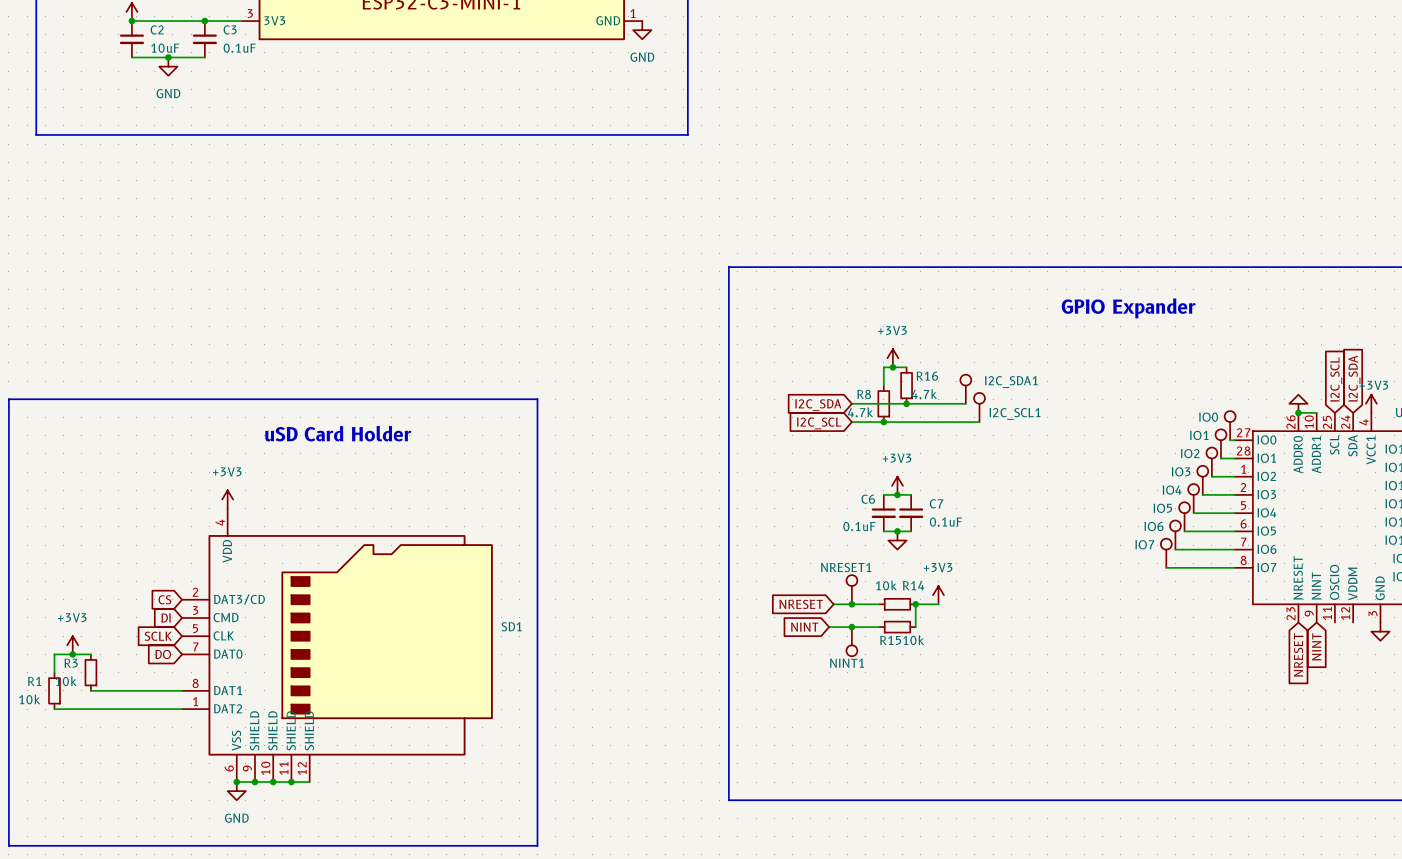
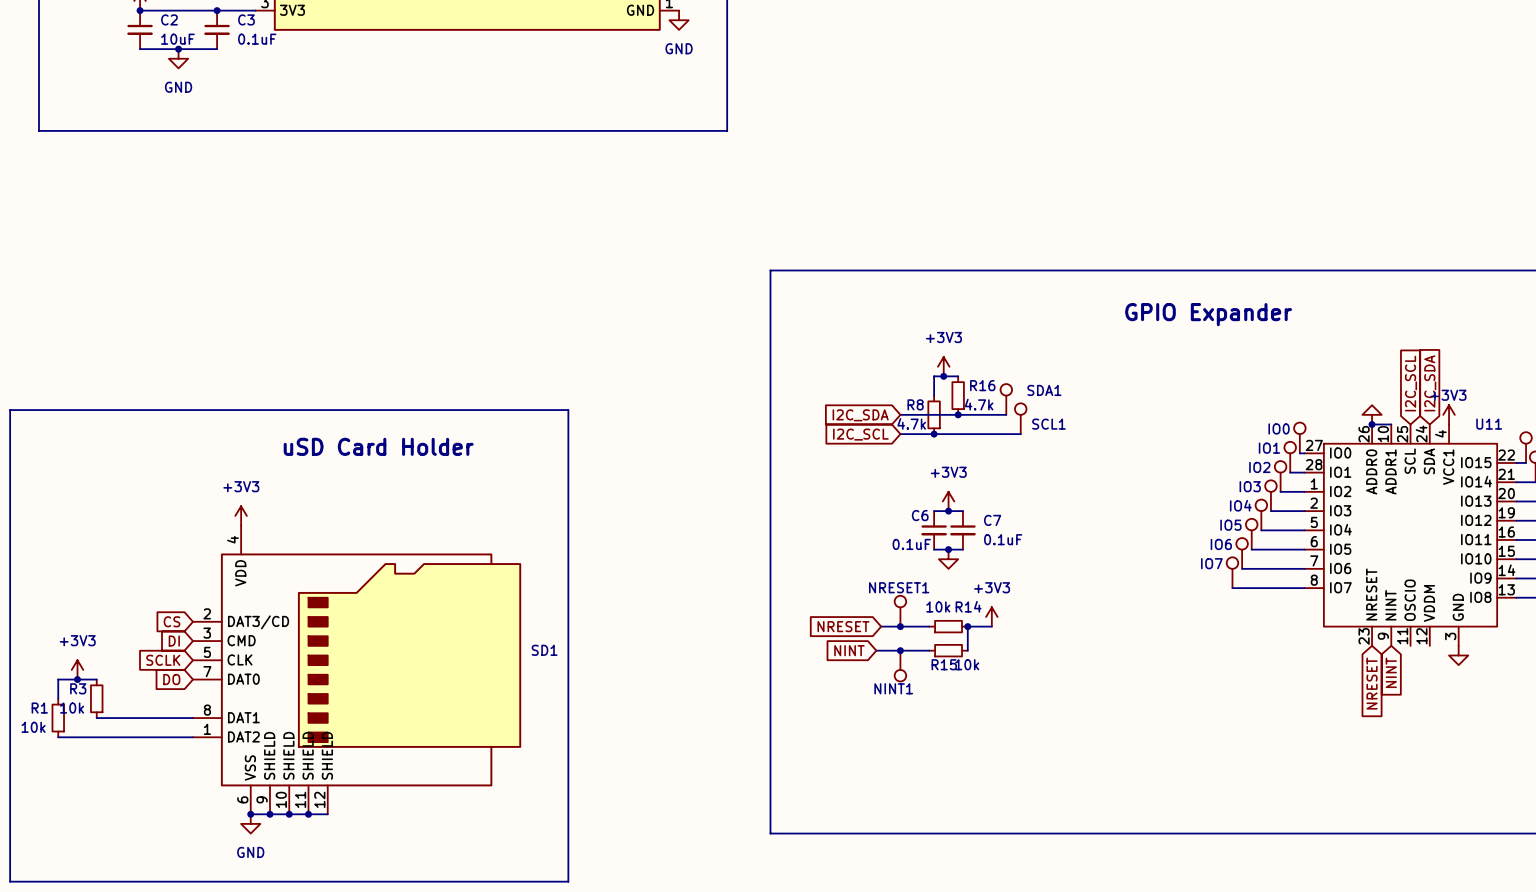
SDA1: none -> (1006, 399)
I2C_SDA1: (965, 389) -> none
wire: (952, 403) (965, 403) -> none
SCL1: none -> (1020, 418)
I2C_SCL1: (979, 407) -> none
wire: (965, 422) (979, 422) -> none

